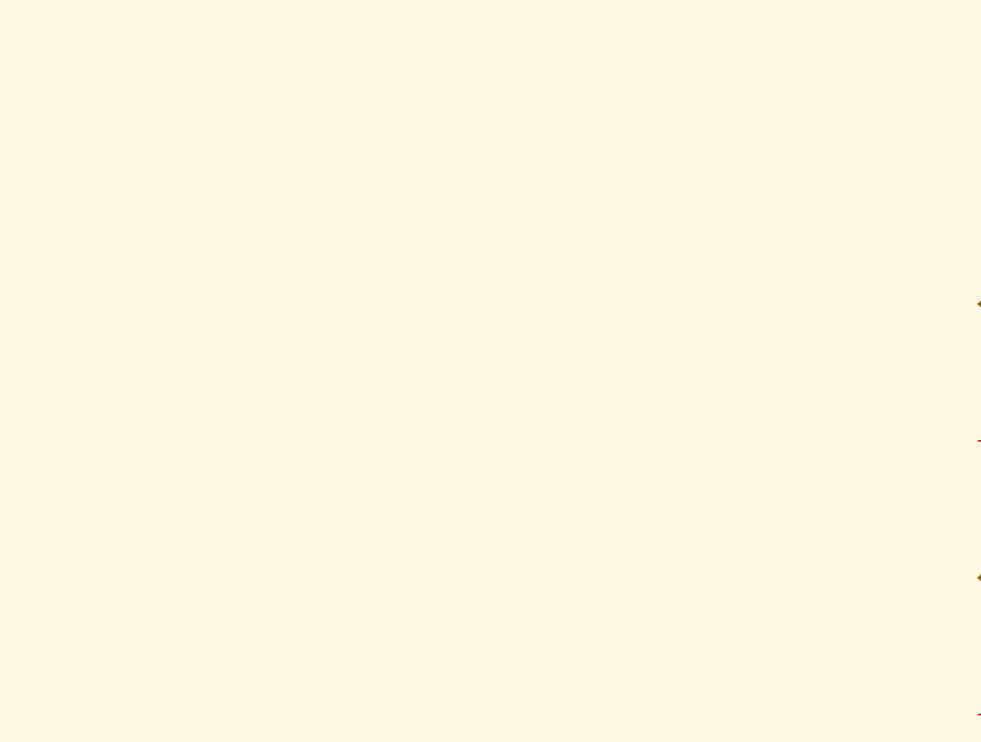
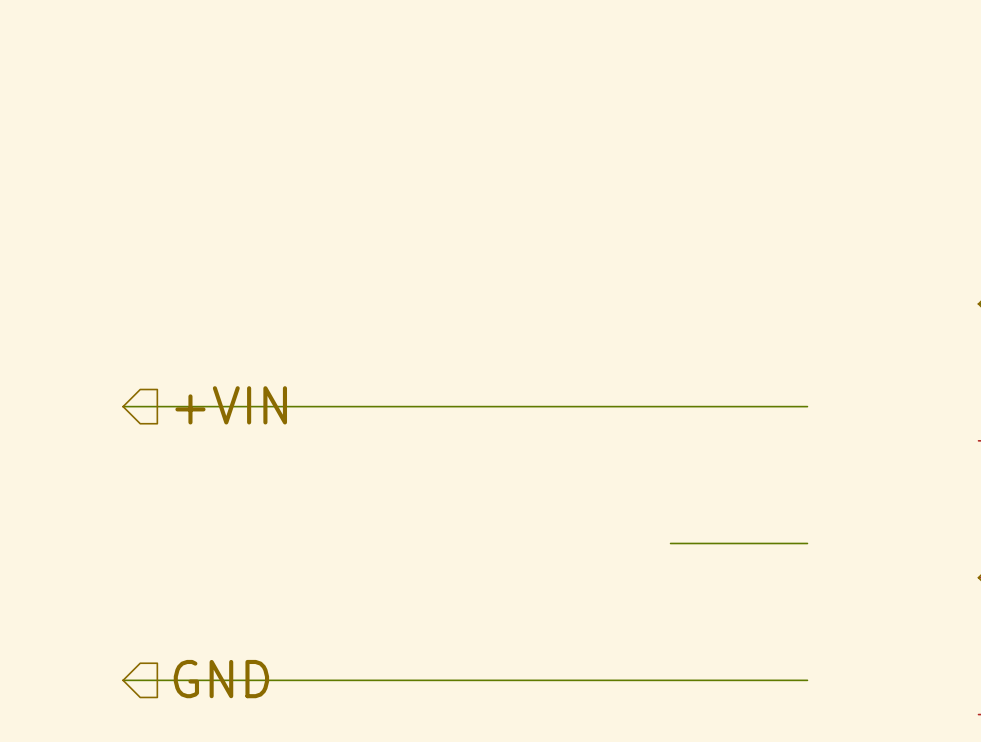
hierarchical label: none -> +VIN (231, 405)
wire: none -> (123, 406) (807, 406)
wire: none -> (670, 543) (807, 543)
hierarchical label: none -> GND (221, 679)
wire: none -> (123, 680) (807, 680)

